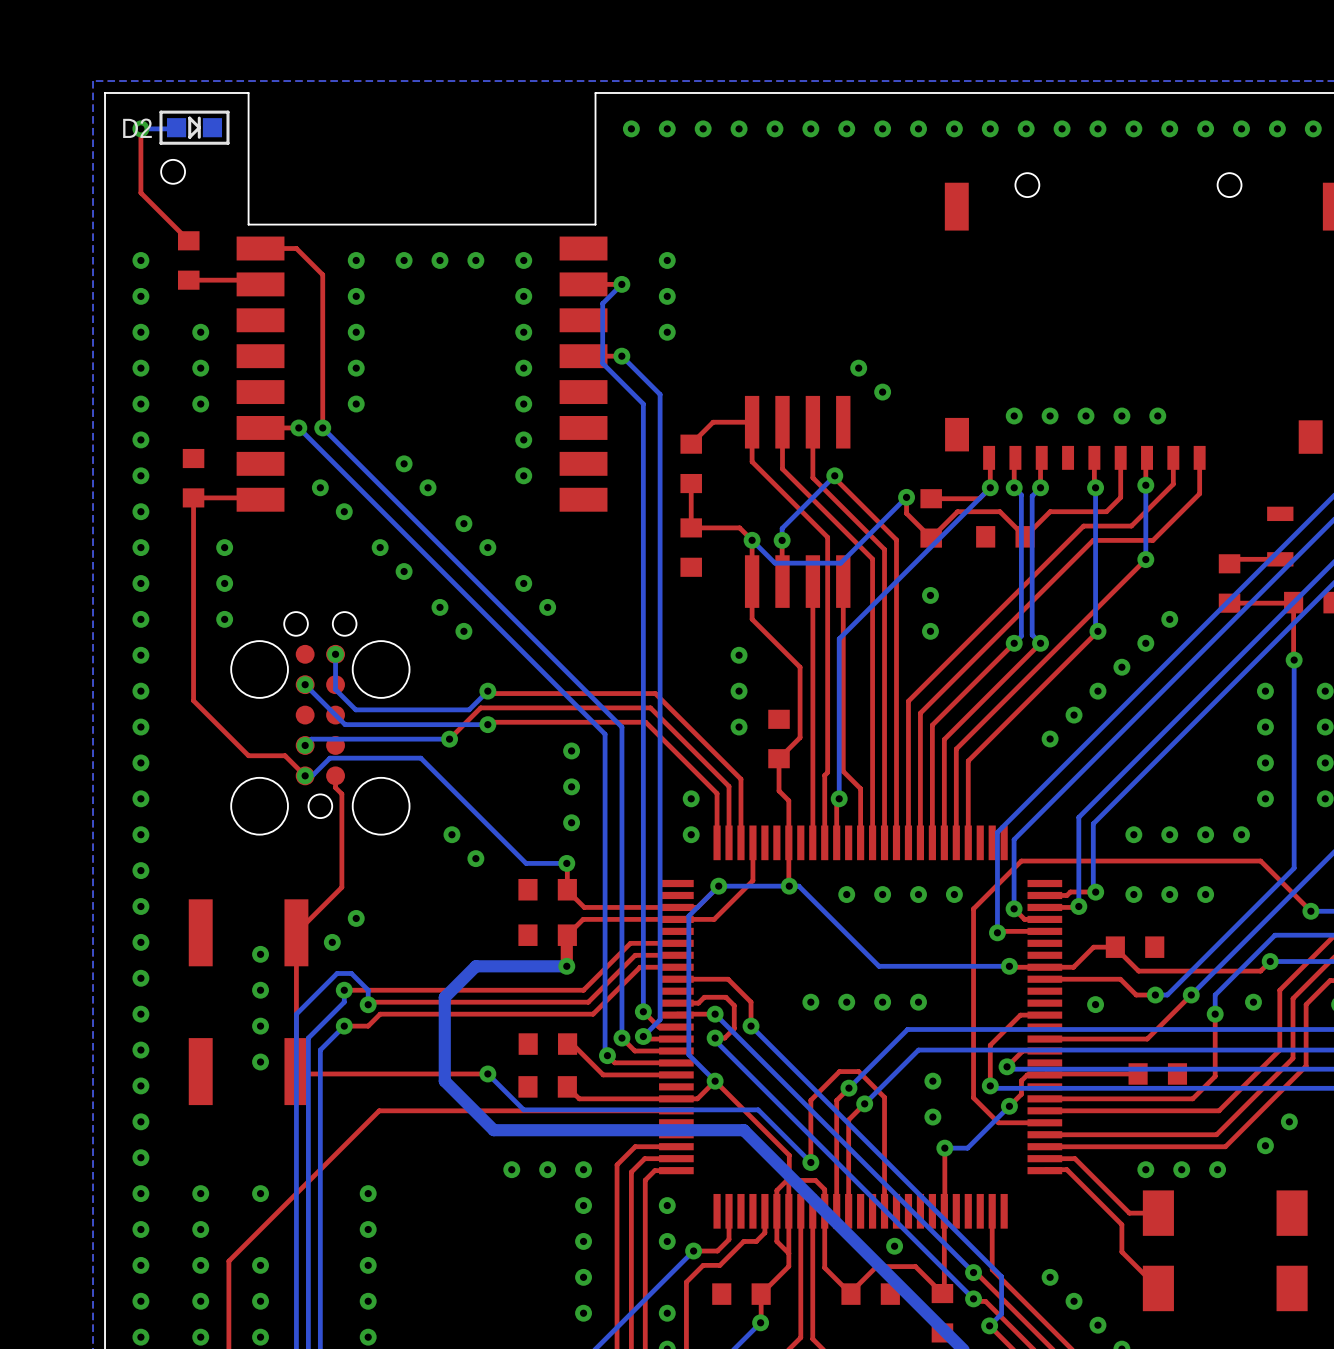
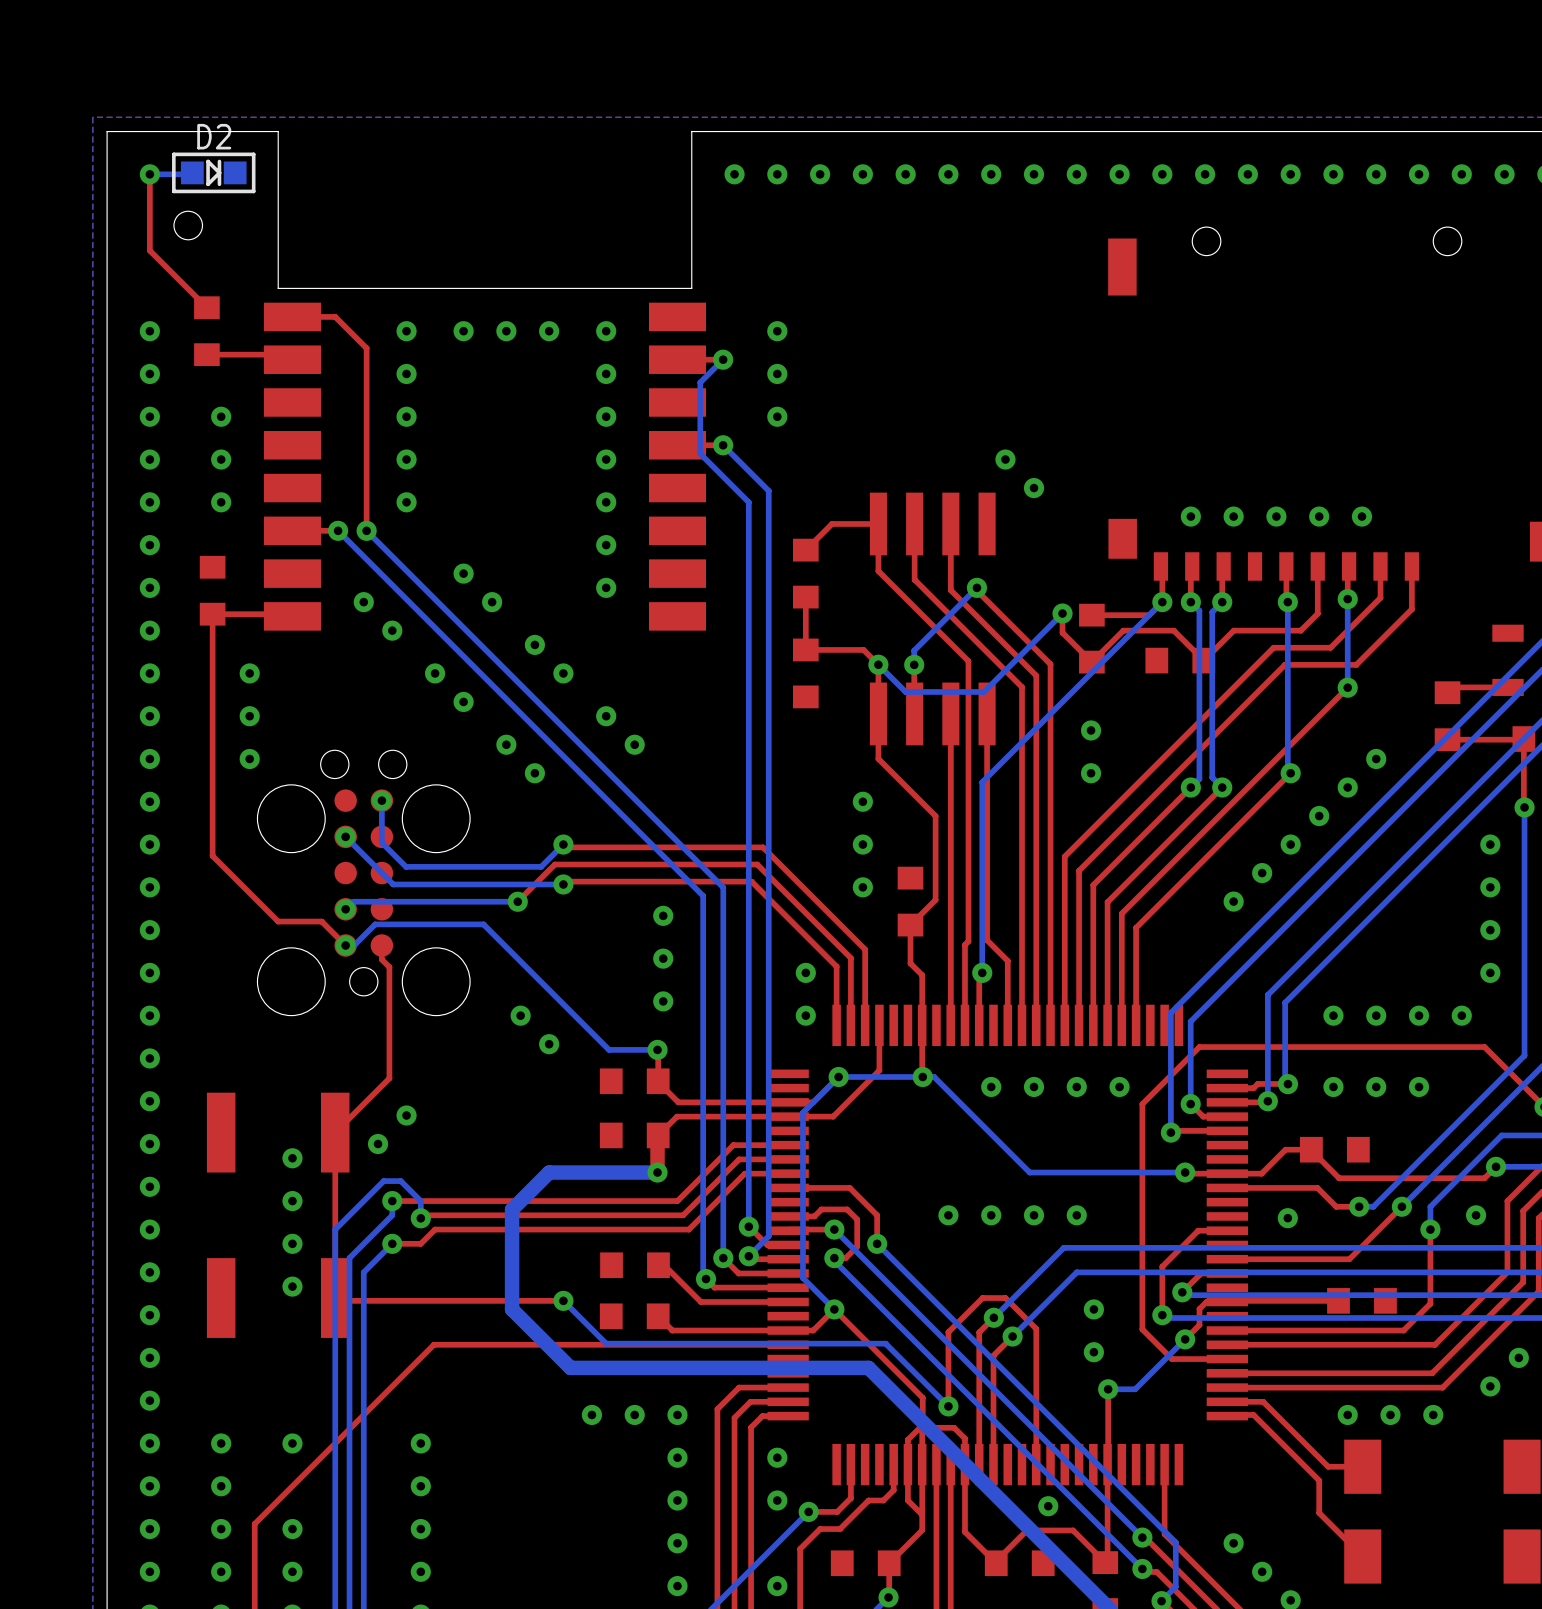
D2 name position: D2 (137, 128) -> D2 (214, 136)

